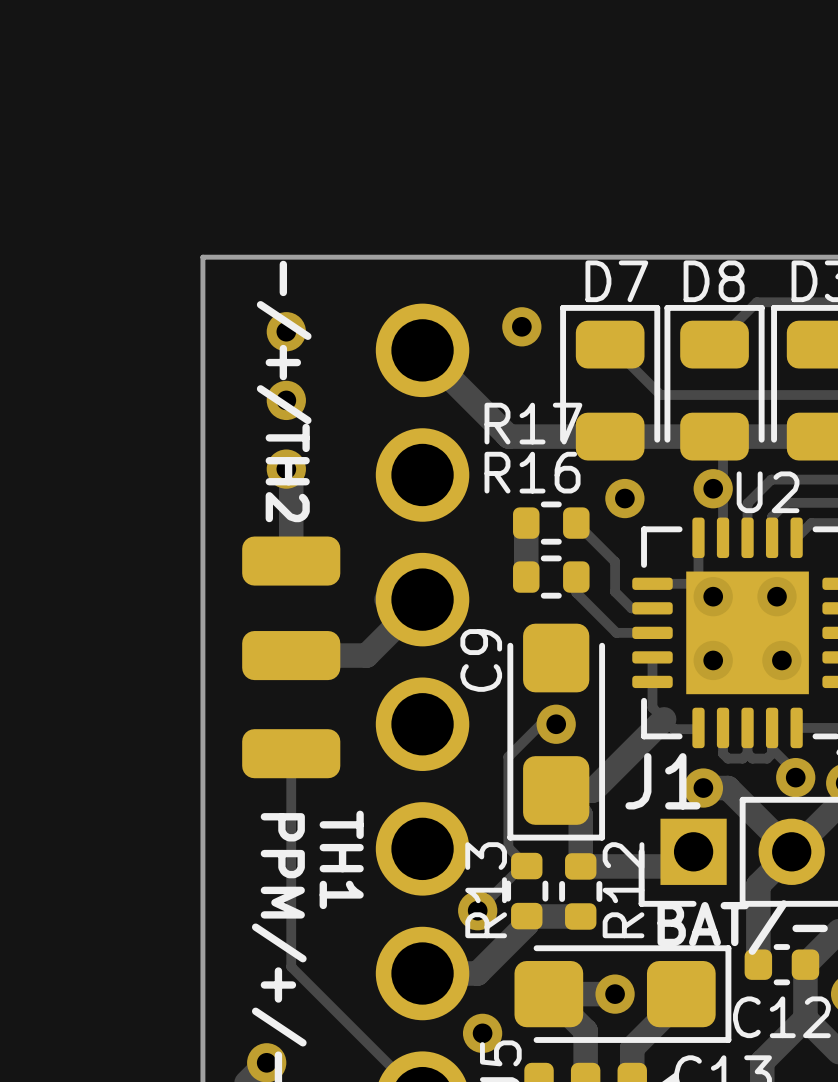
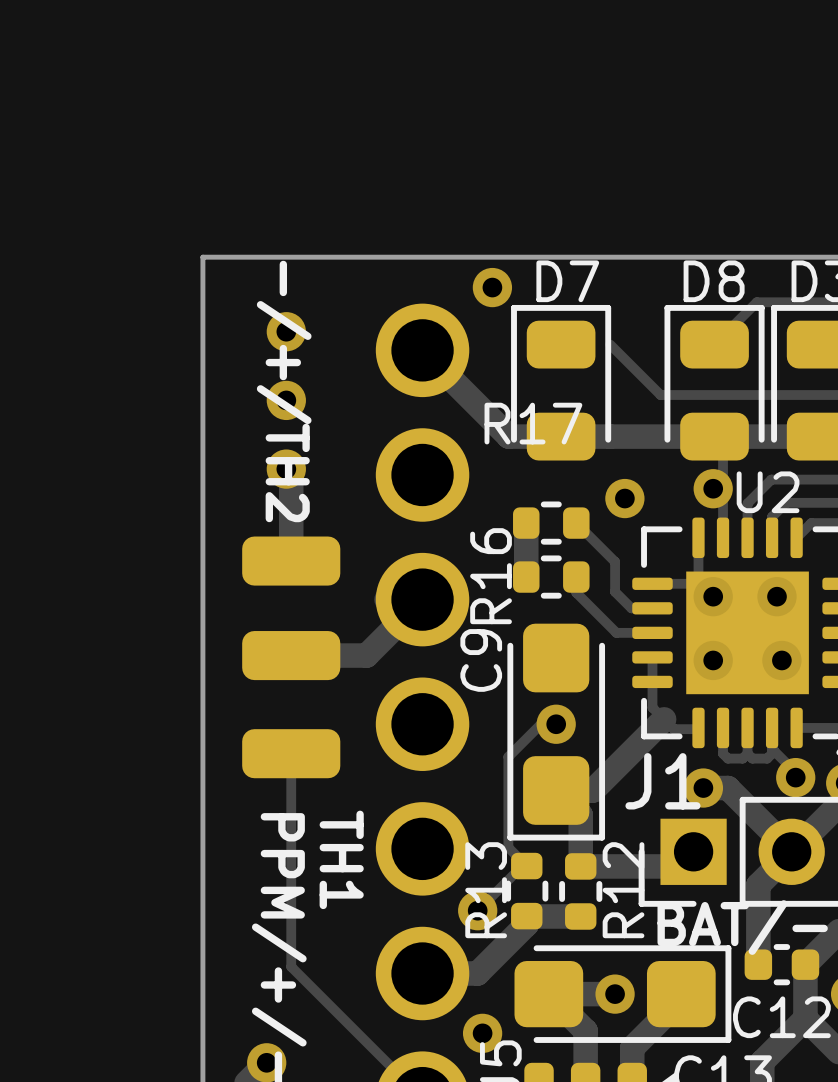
via position: (521, 326) -> (492, 287)
D7 position: (610, 382) -> (561, 382)
R16 name rotation: 0° (532, 472) -> 90° counterclockwise (491, 576)

